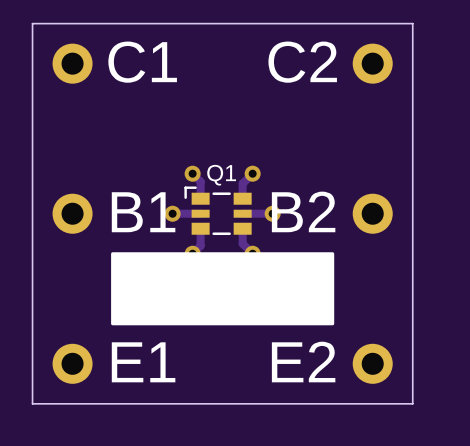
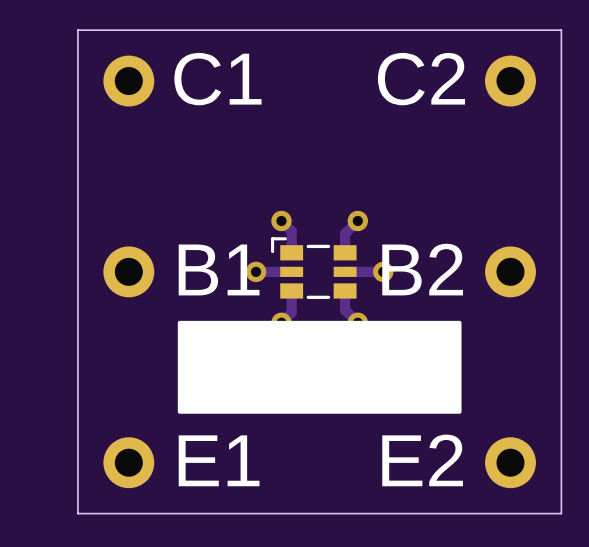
Q1 name: Q1 (221, 175) -> none

